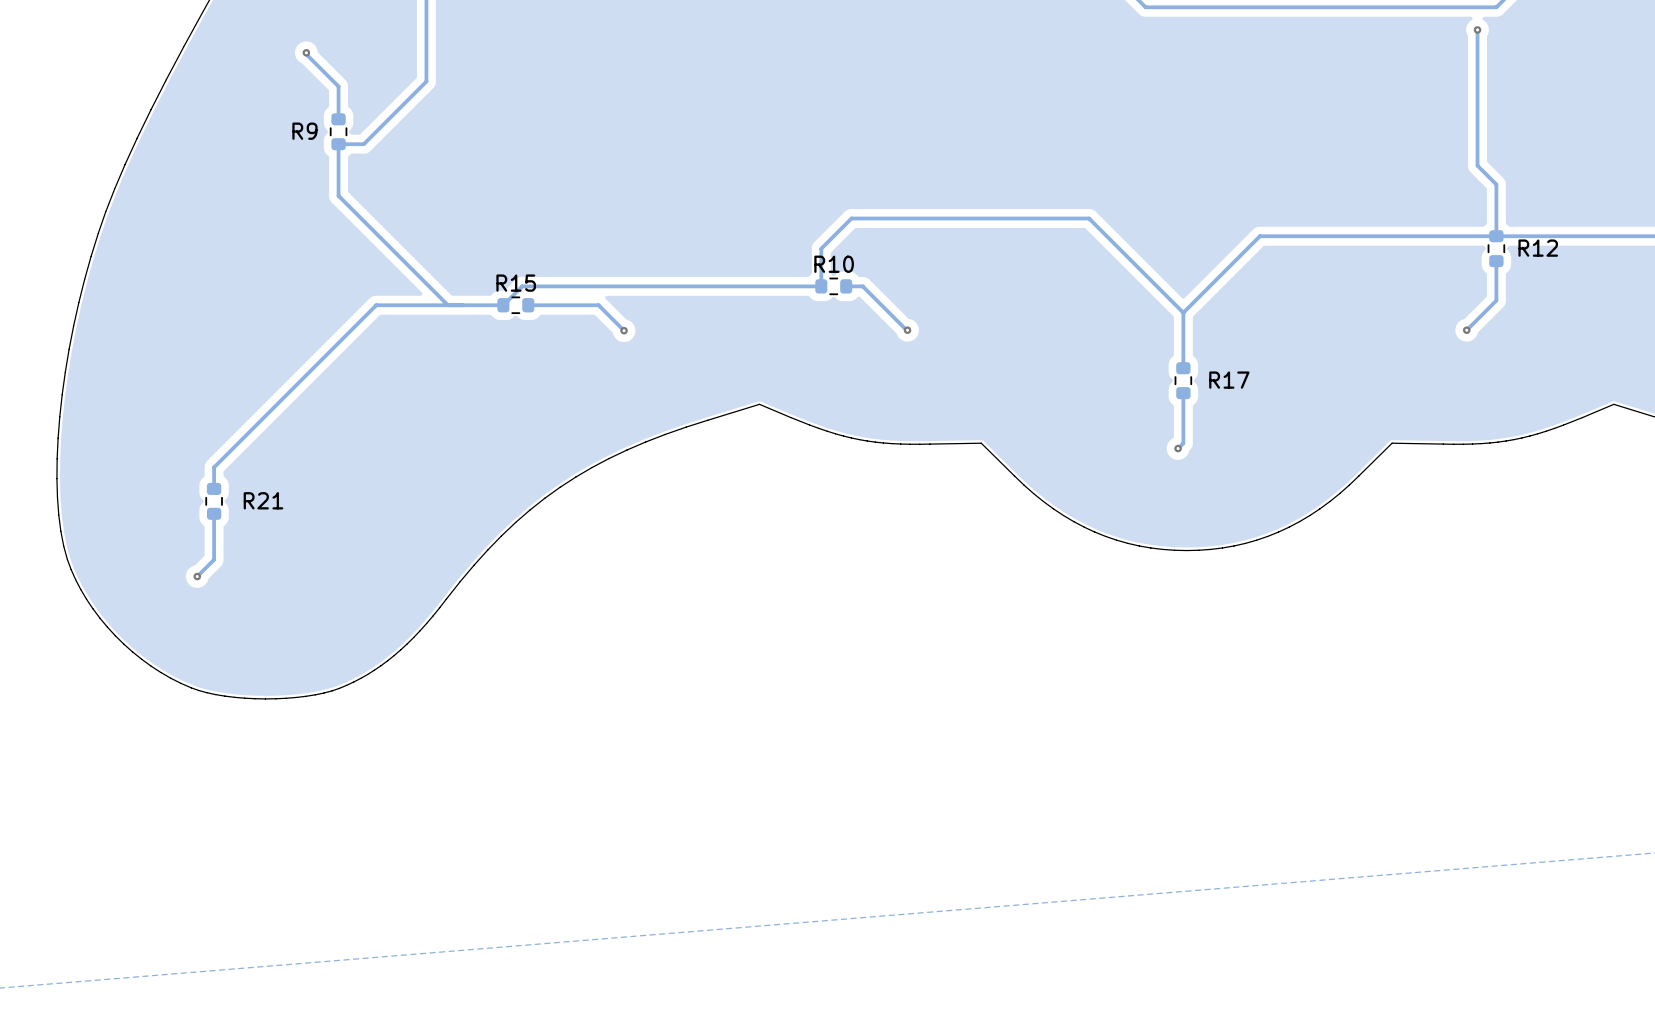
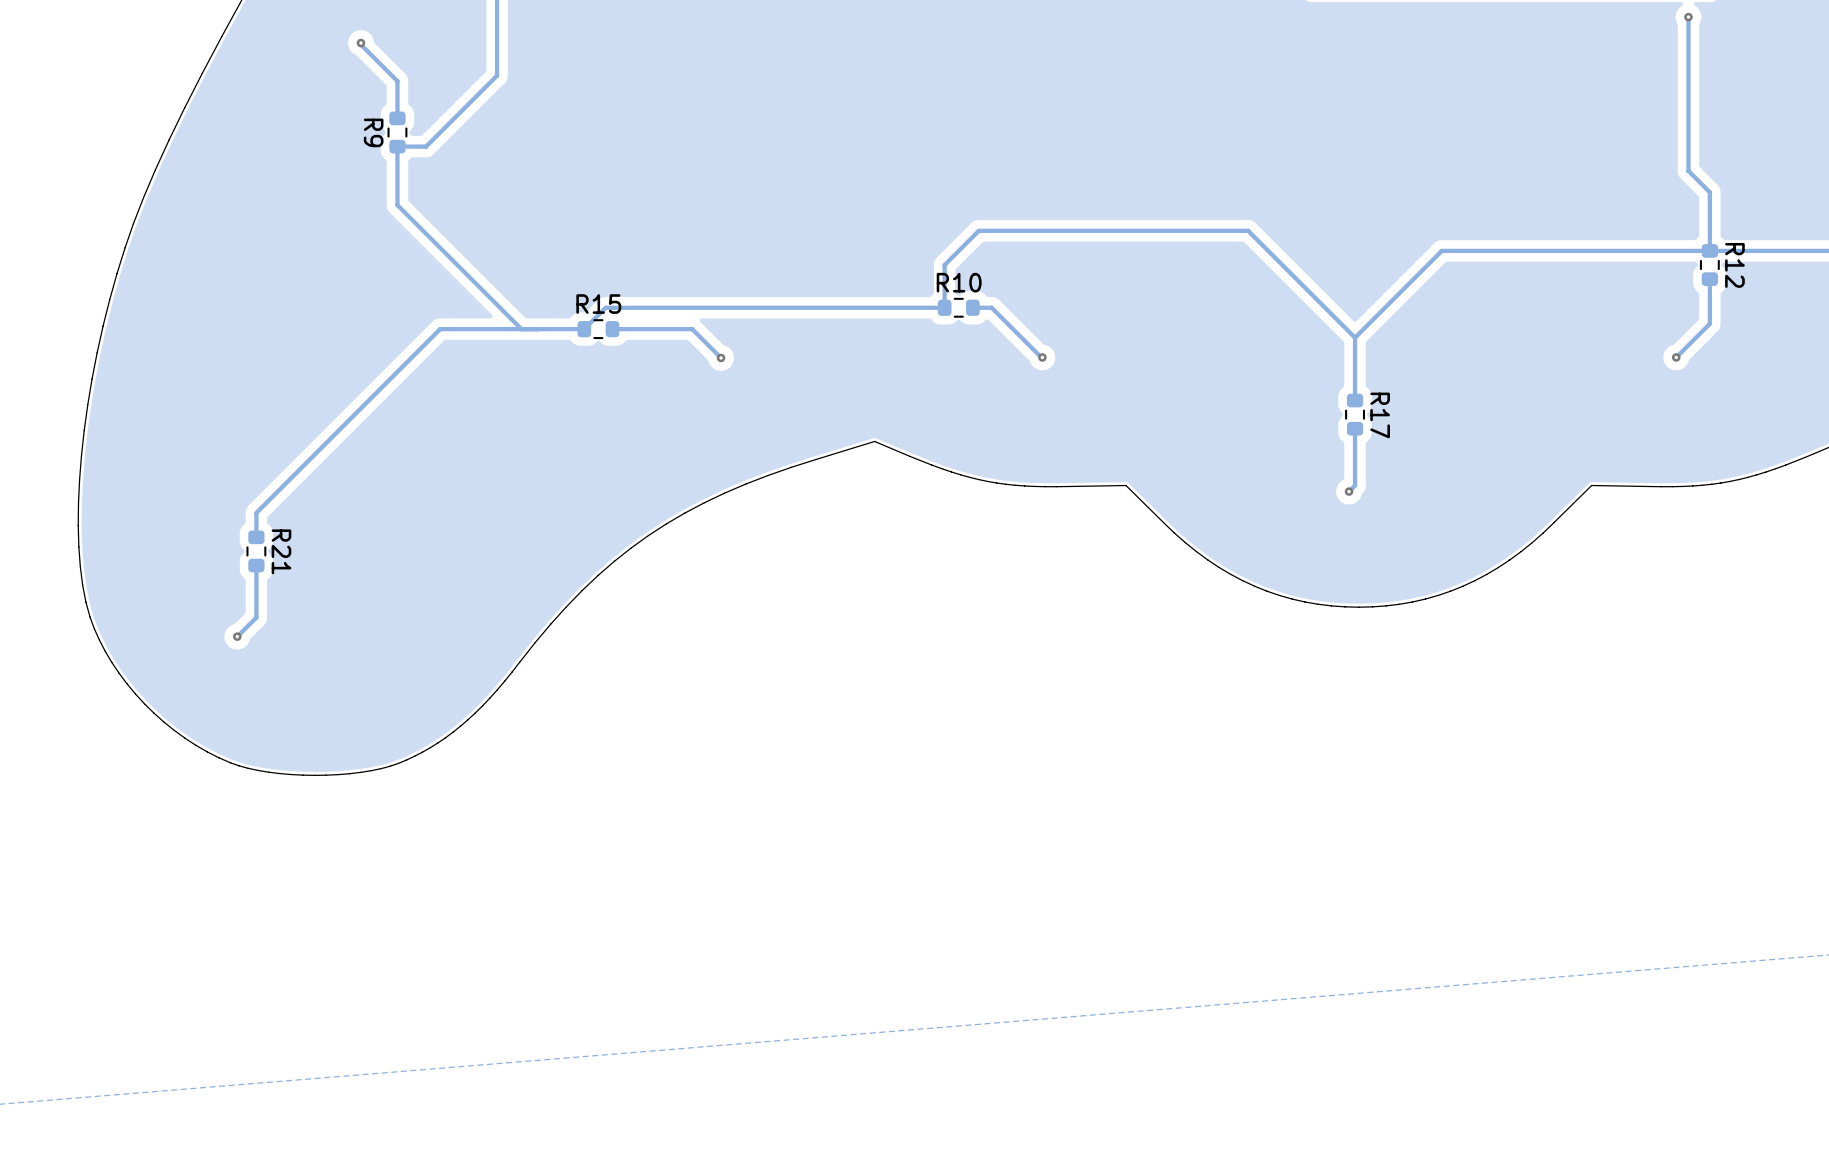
R9 name rotation: 0° (304, 131) -> 90° clockwise (373, 132)
R12 name rotation: 0° (1538, 248) -> 90° clockwise (1734, 265)
R17 name rotation: 0° (1229, 380) -> 90° clockwise (1380, 415)
R21 name rotation: 0° (263, 500) -> 90° clockwise (281, 551)

